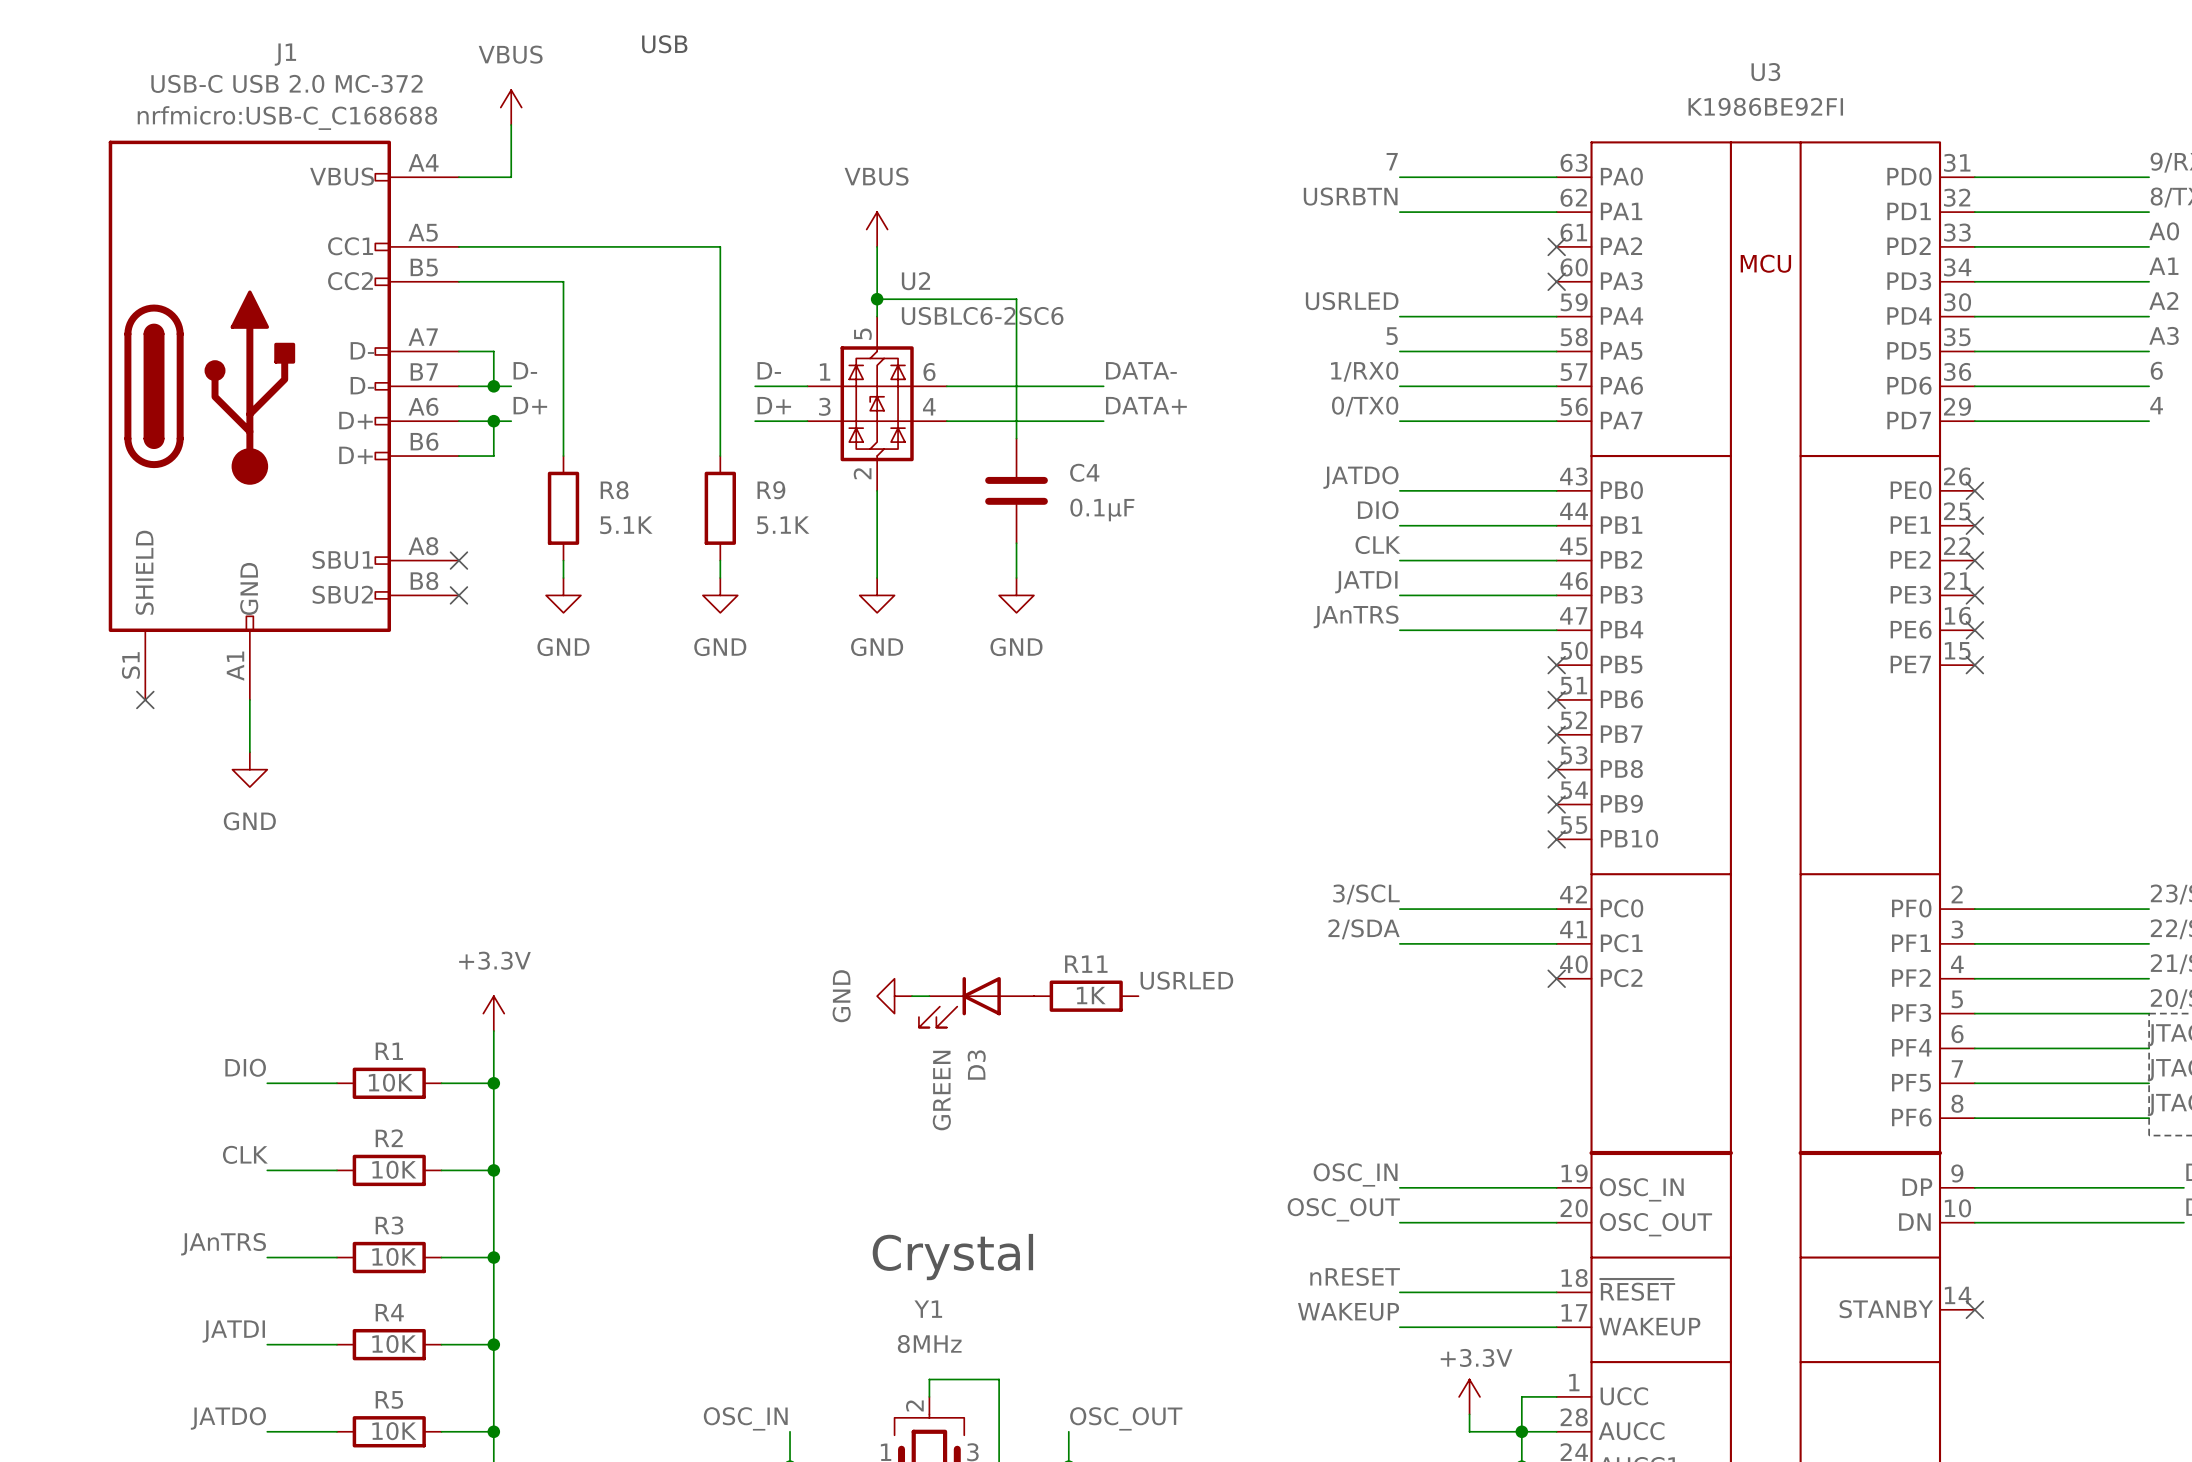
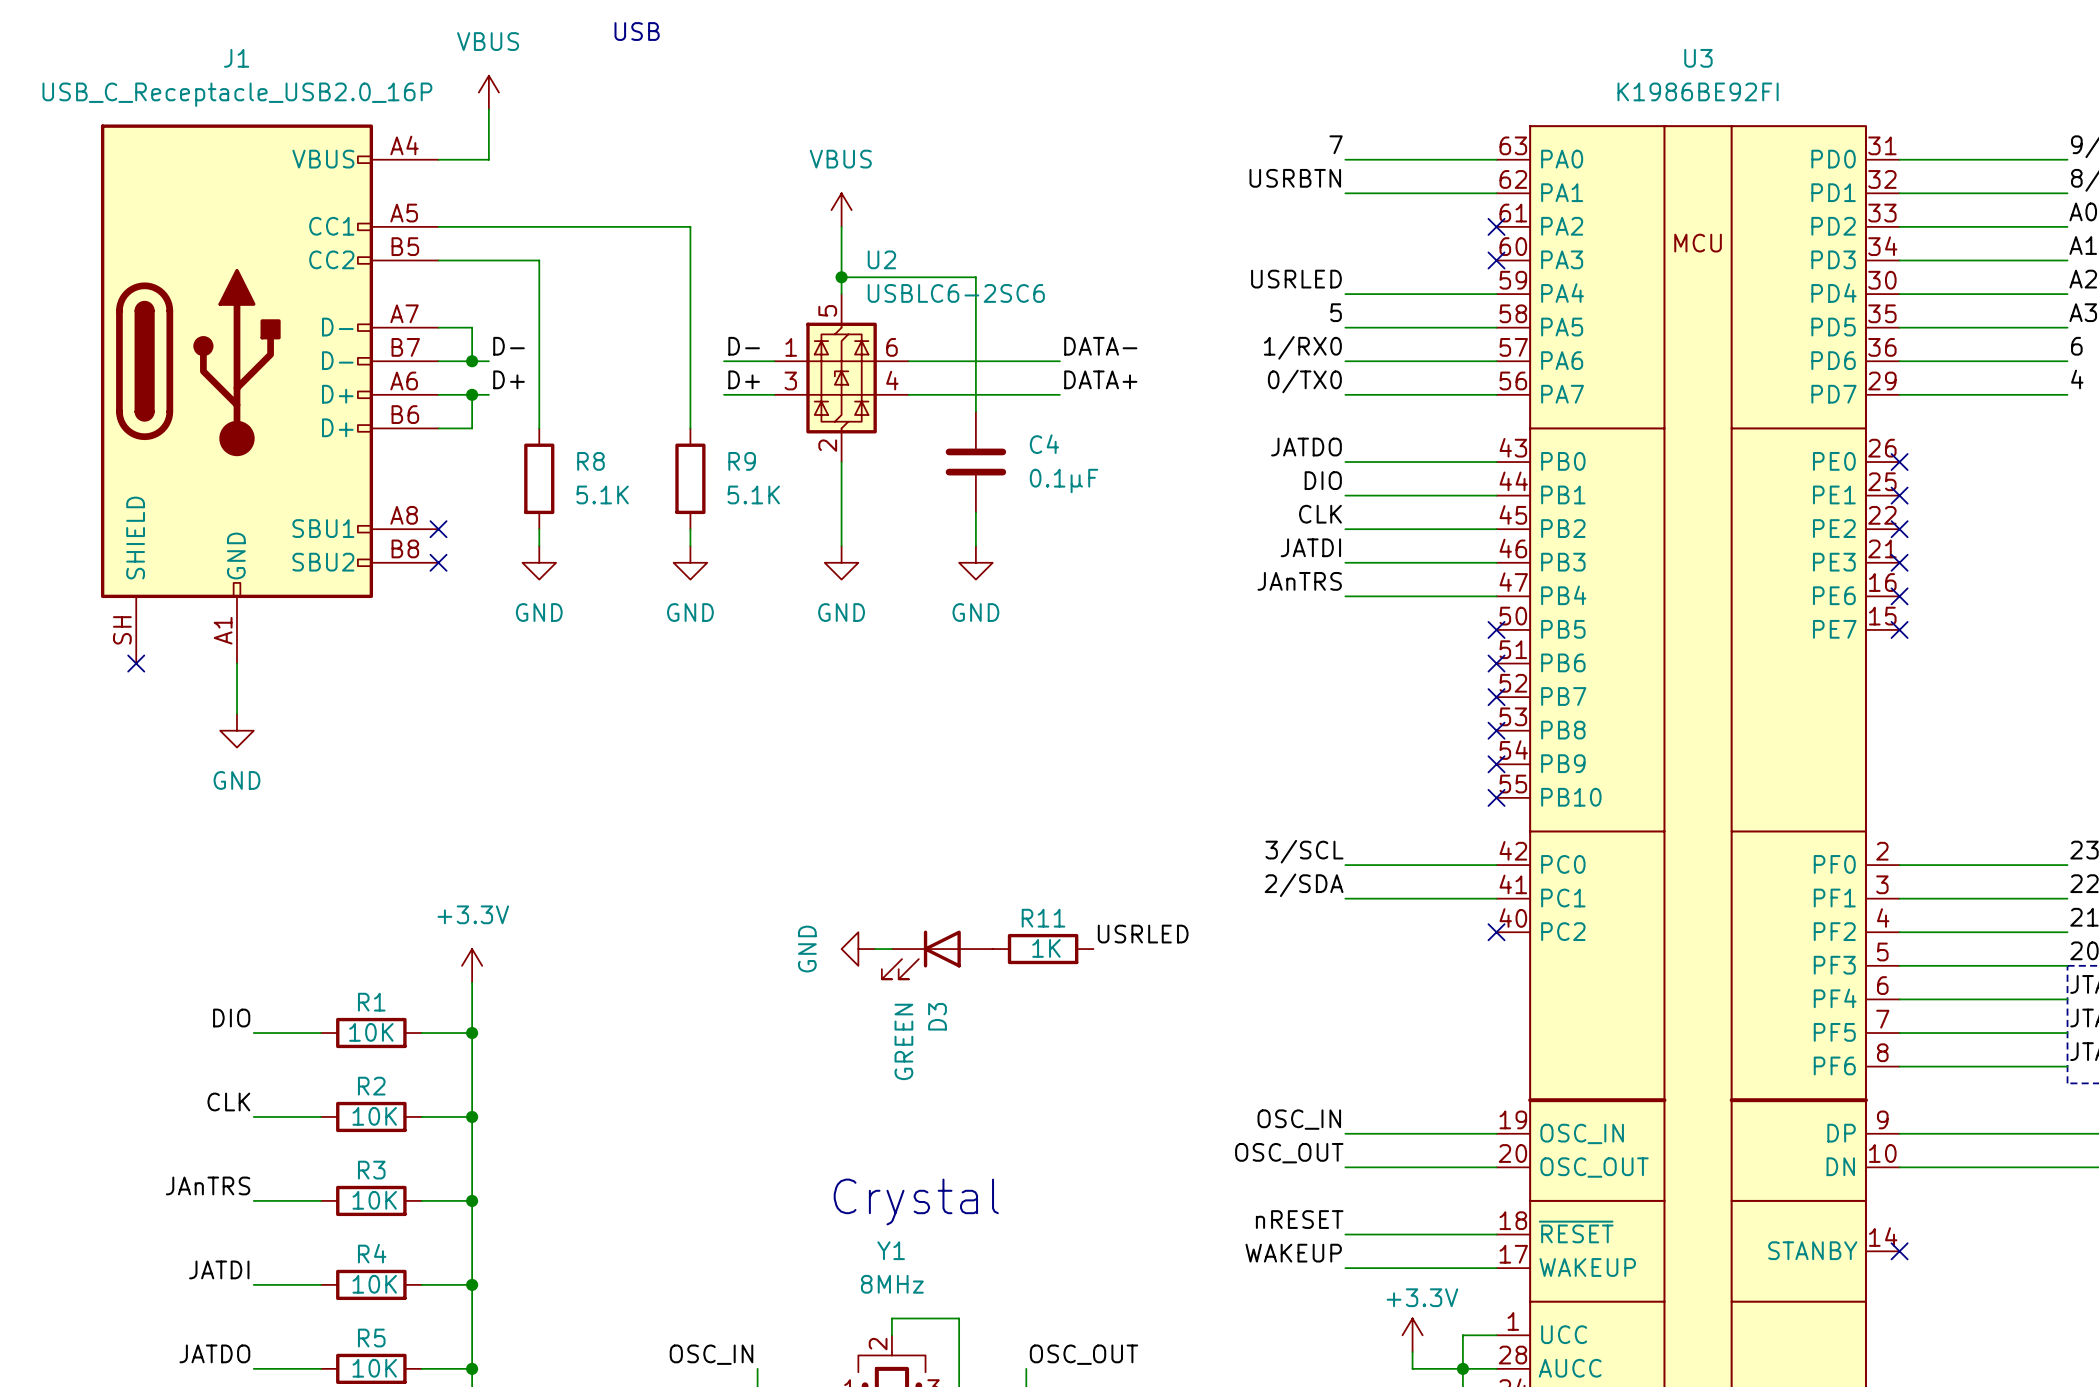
J1 name position: J1 (285, 54) -> J1 (236, 58)
J1 value: USB-C USB 2.0 MC-372 (286, 83) -> USB_C_Receptacle_USB2.0_16P (237, 94)
J1 text: nrfmicro:USB-C_C168688 (287, 118) -> none
J1 pin number: S1 (130, 665) -> SH (122, 630)

